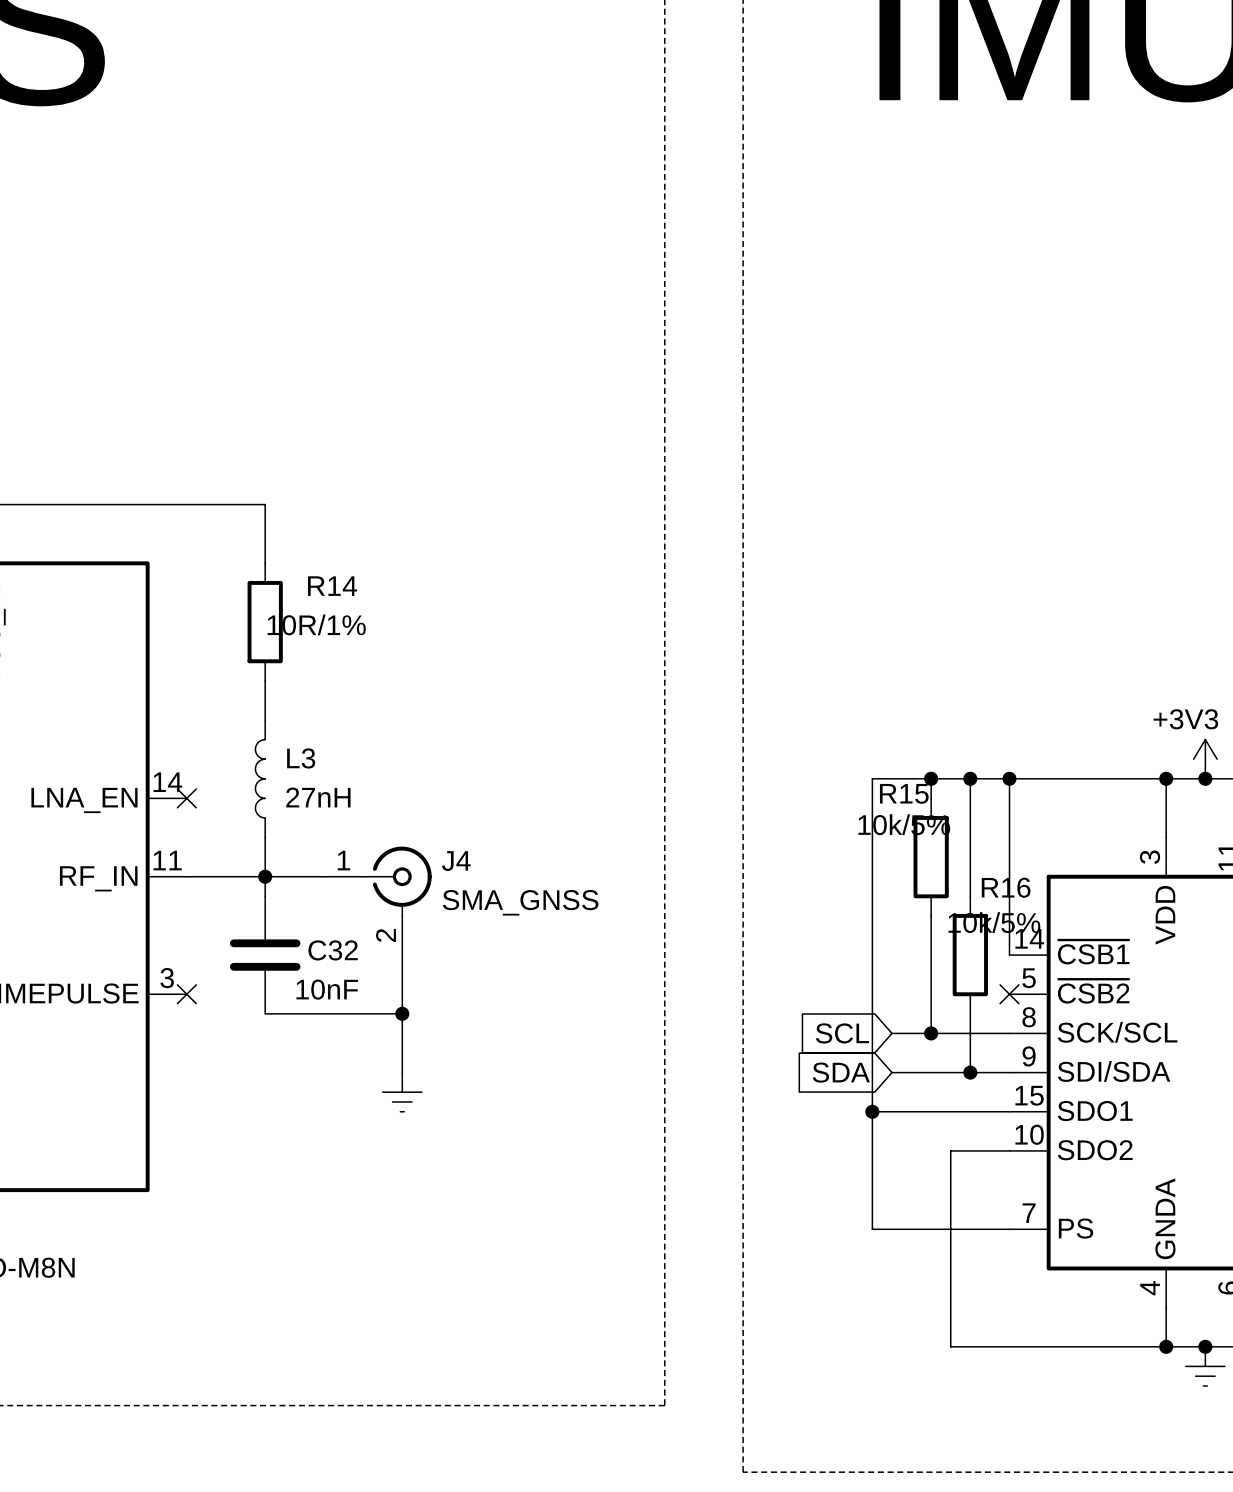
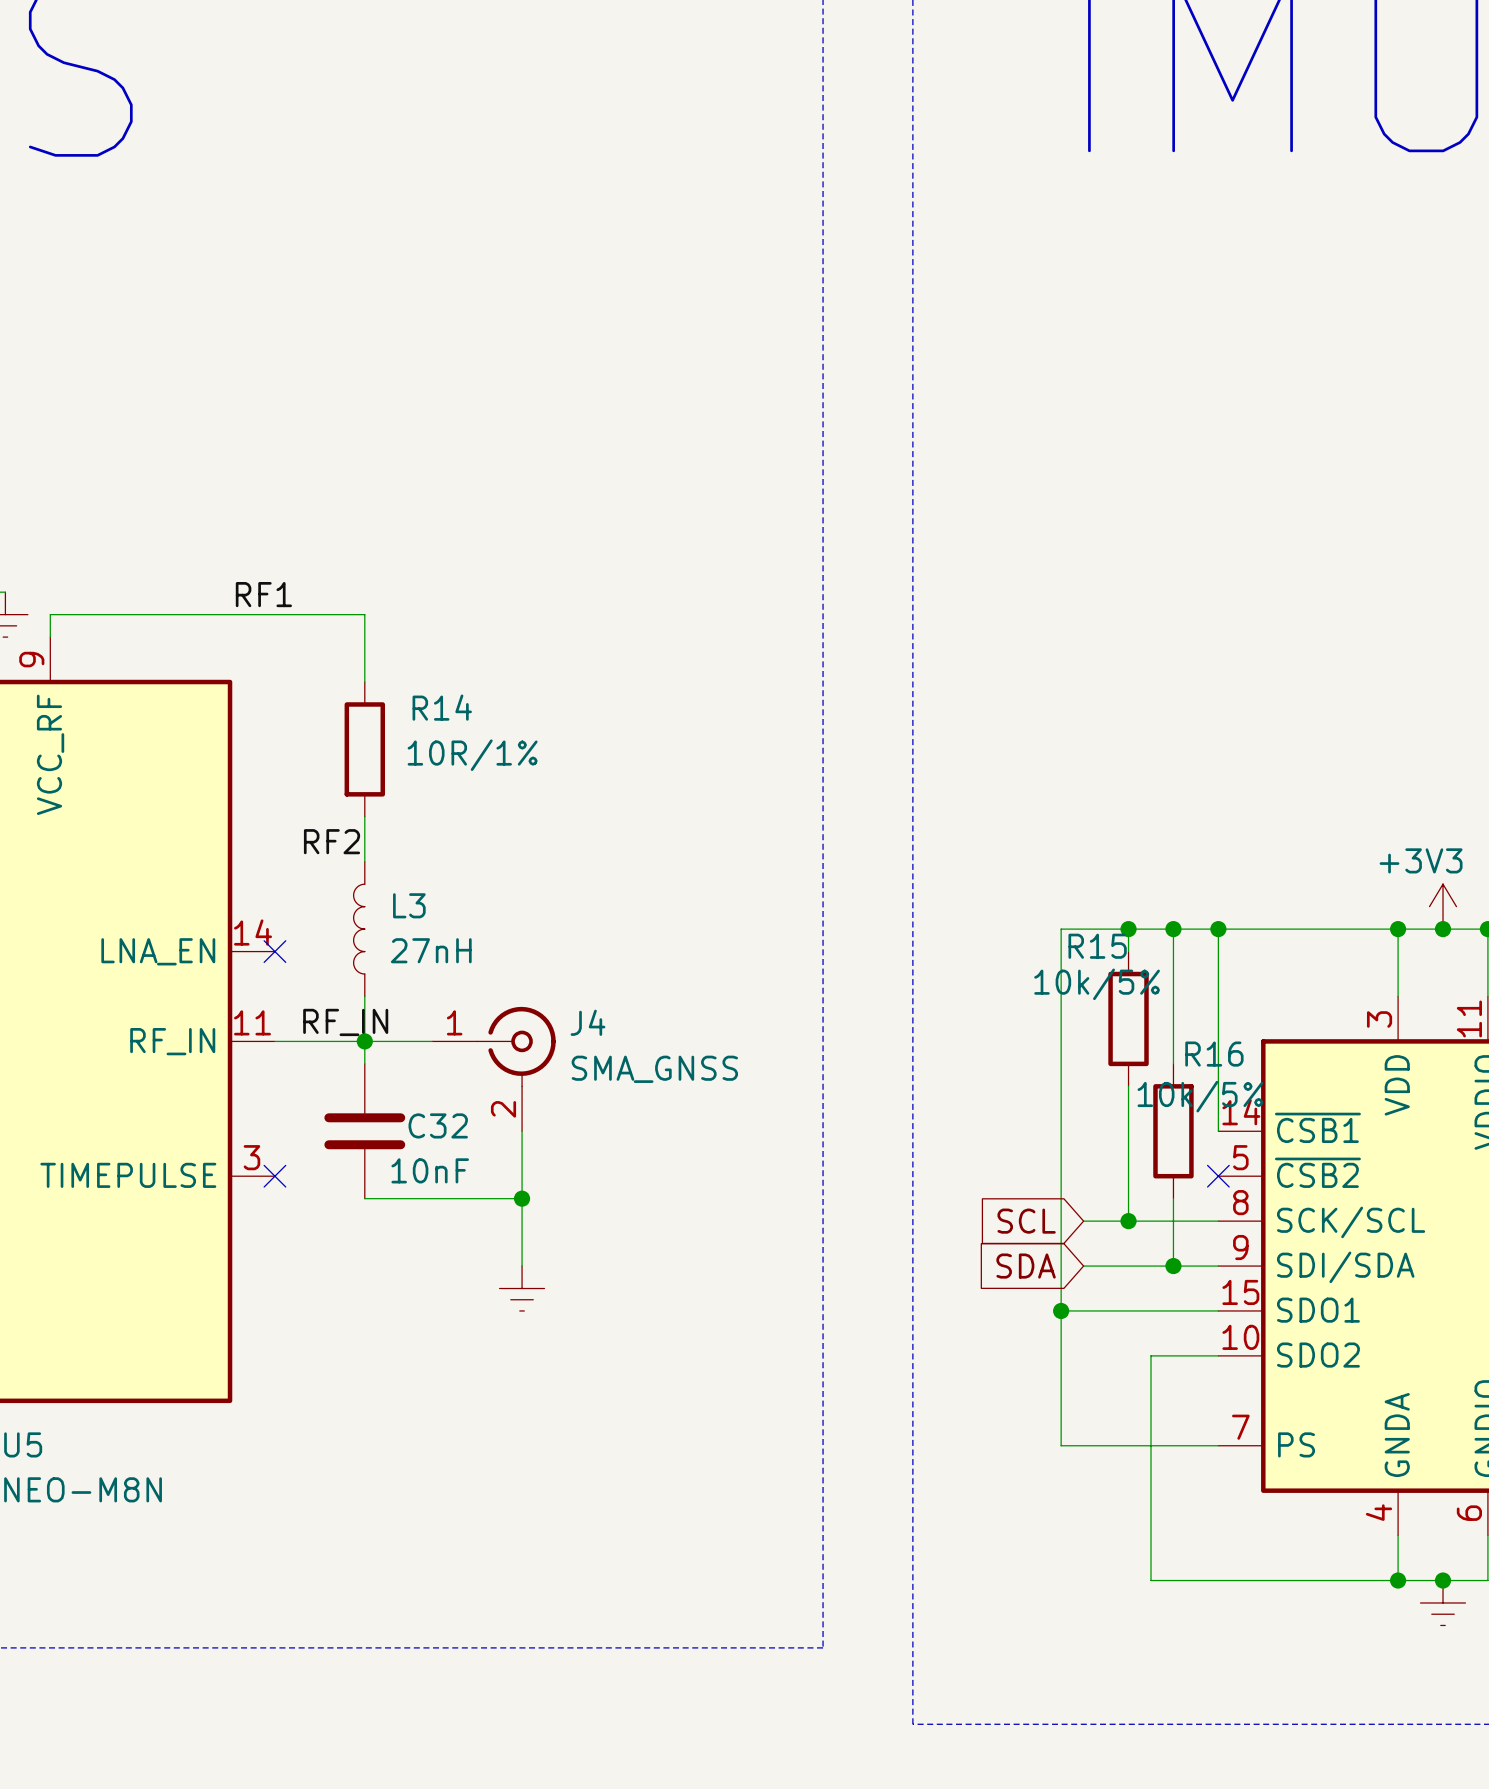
label: none -> RF1 (263, 594)
R14 value position: 10R/1% (316, 624) -> 10R/1% (472, 755)
label: none -> RF2 (332, 841)
label: none -> RF_IN (345, 1022)

